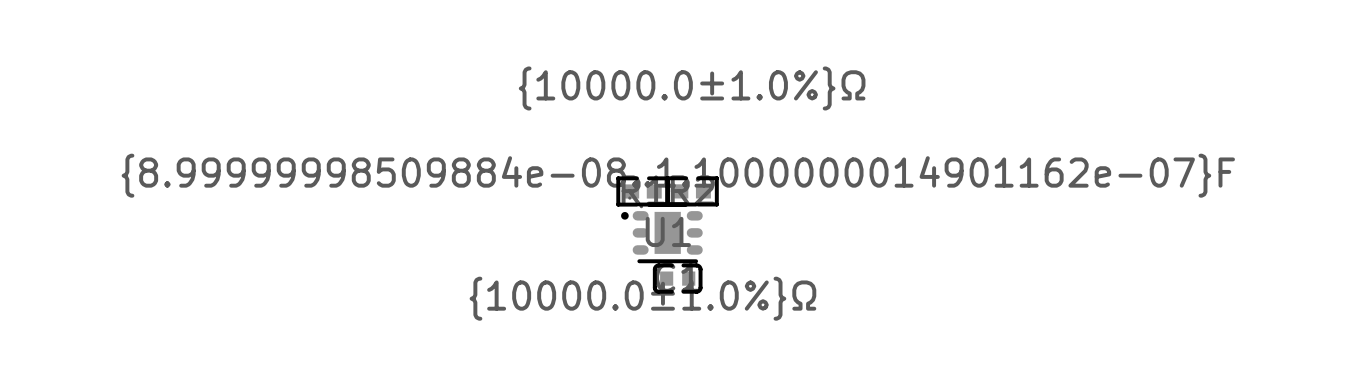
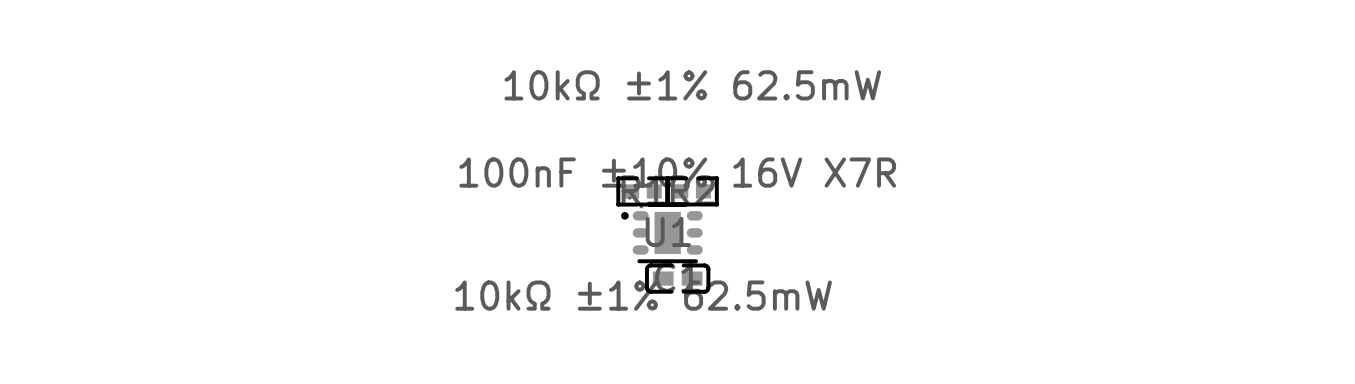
part value: {10000.0±1.0%}Ω (692, 88) -> 10kΩ ±1% 62.5mW (692, 85)
part value: {8.99999998509884e-08..1.1000000014901162e-07}F (678, 175) -> 100nF ±10% 16V X7R (677, 172)
part footprint: [652, 263, 703, 294] -> [644, 263, 711, 294]
part value: {10000.0±1.0%}Ω (642, 298) -> 10kΩ ±1% 62.5mW (643, 295)

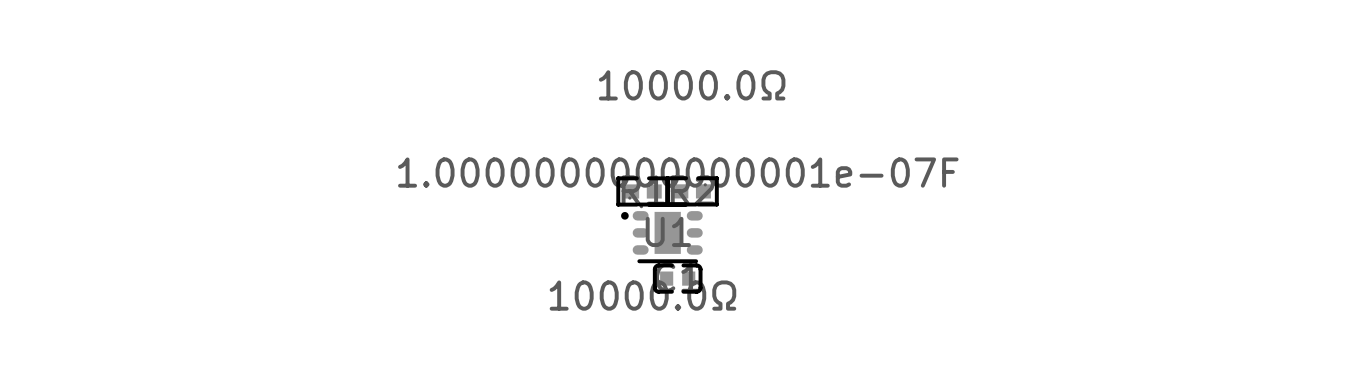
part value: 10kΩ ±1% 62.5mW (692, 85) -> 10000.0Ω (692, 85)
part value: 100nF ±10% 16V X7R (677, 172) -> 1.0000000000000001e-07F (678, 172)
part footprint: [644, 263, 711, 294] -> [652, 263, 703, 294]
part value: 10kΩ ±1% 62.5mW (643, 295) -> 10000.0Ω (642, 295)

